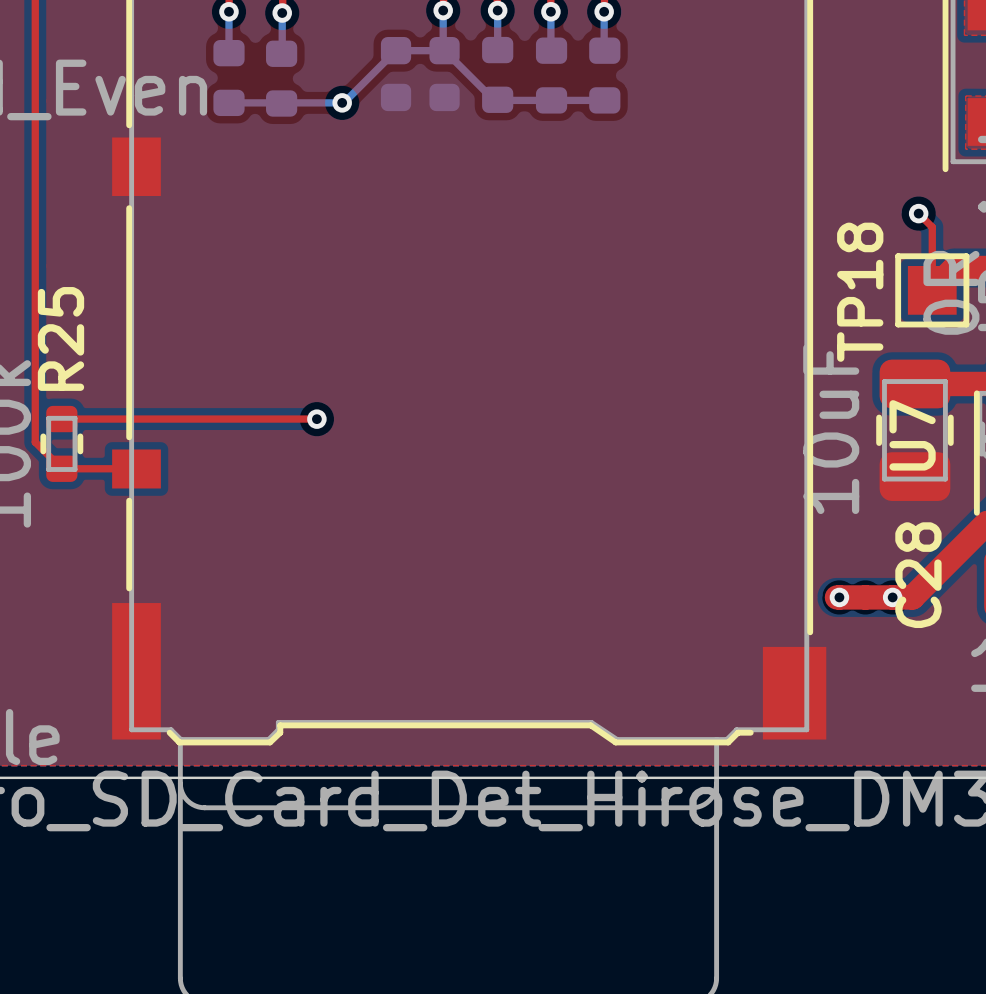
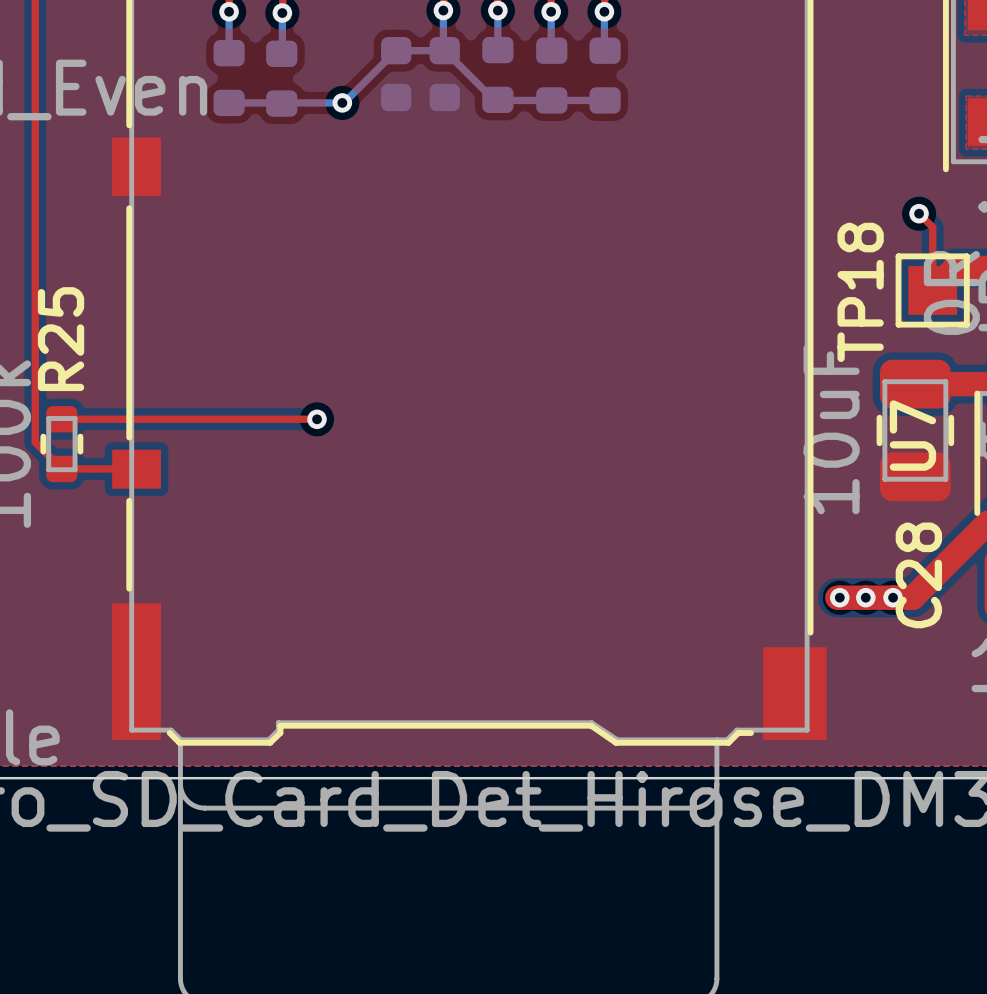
via: none -> (865, 597)

